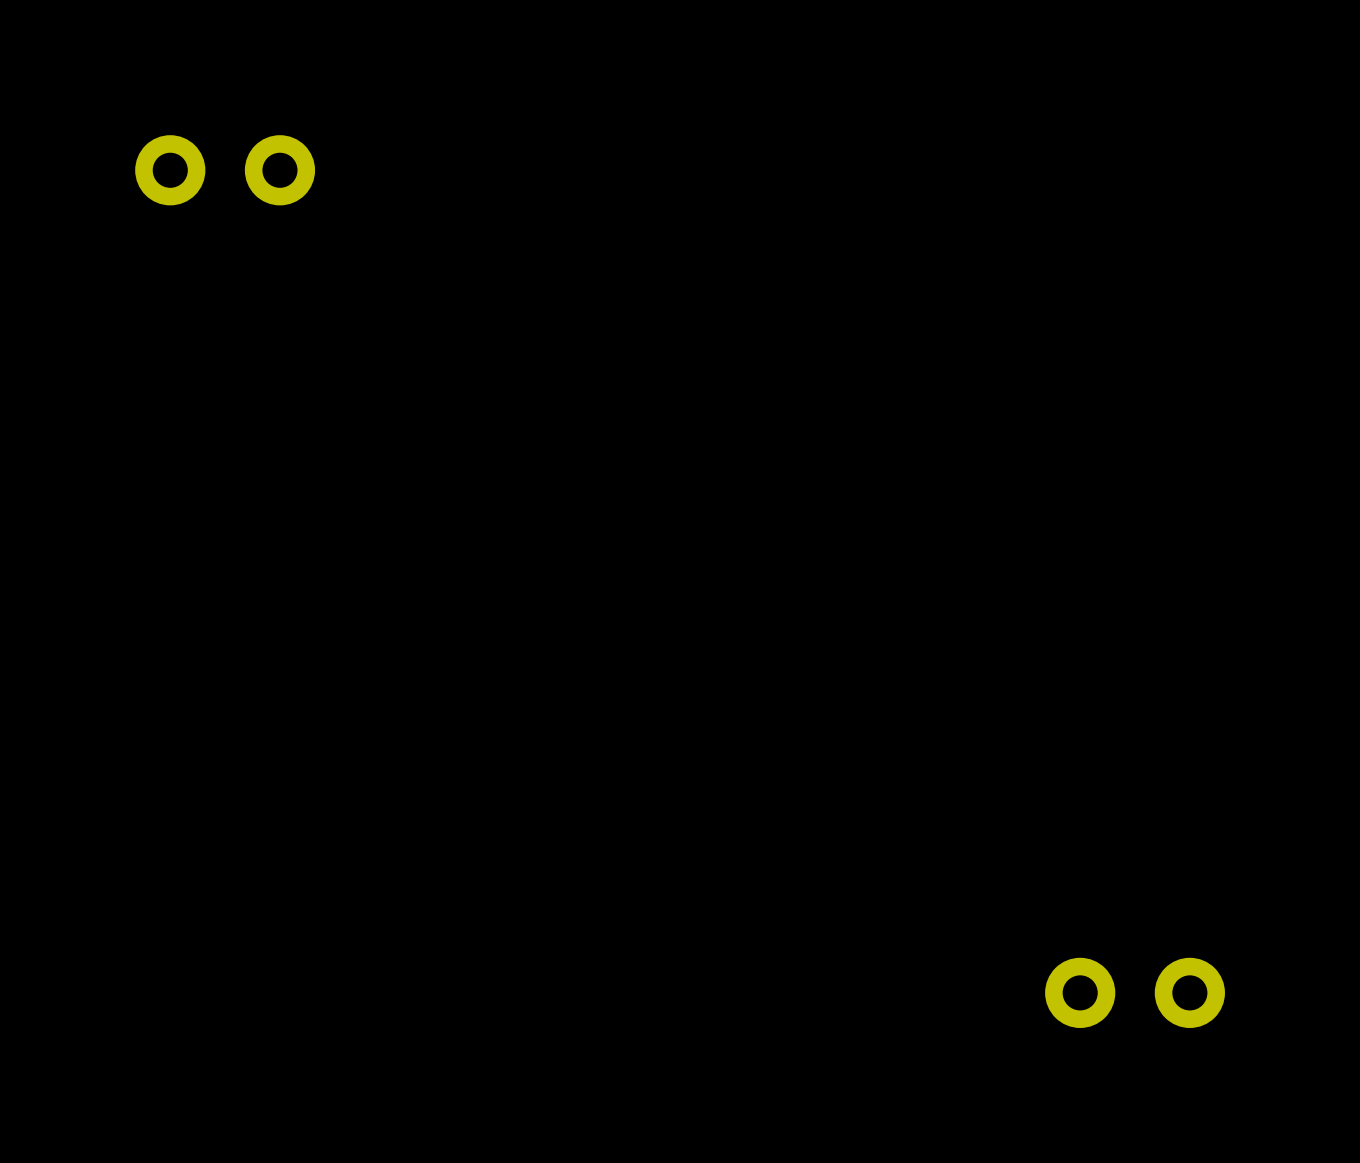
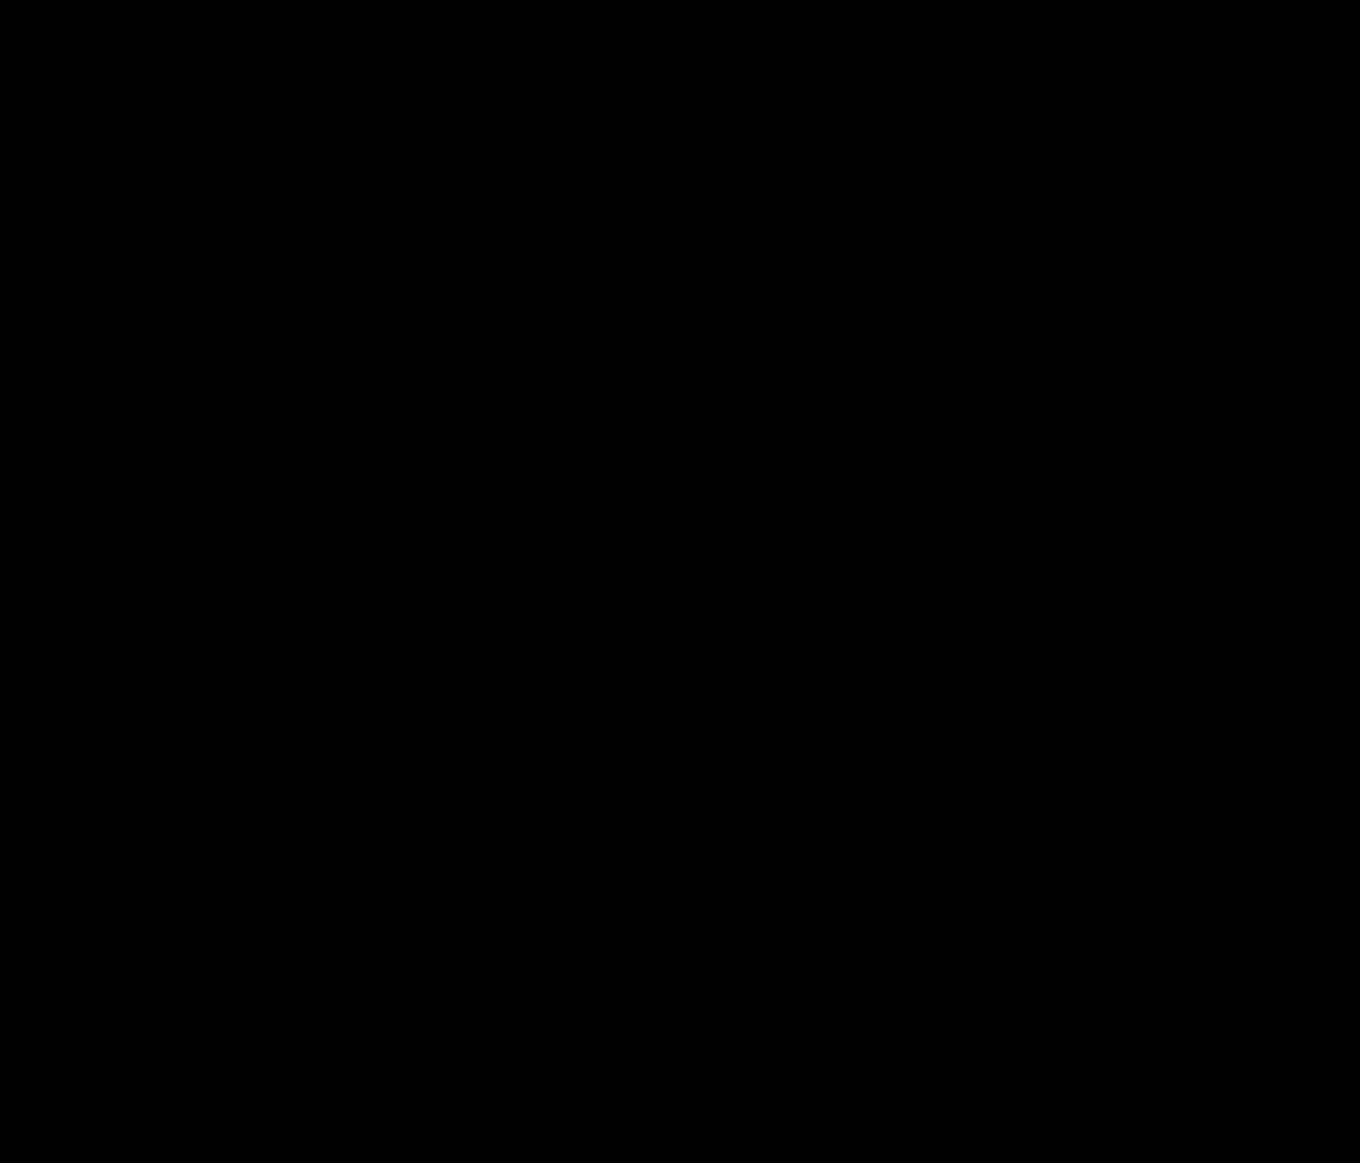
part: (225, 170) -> none
part: (1135, 992) -> none

